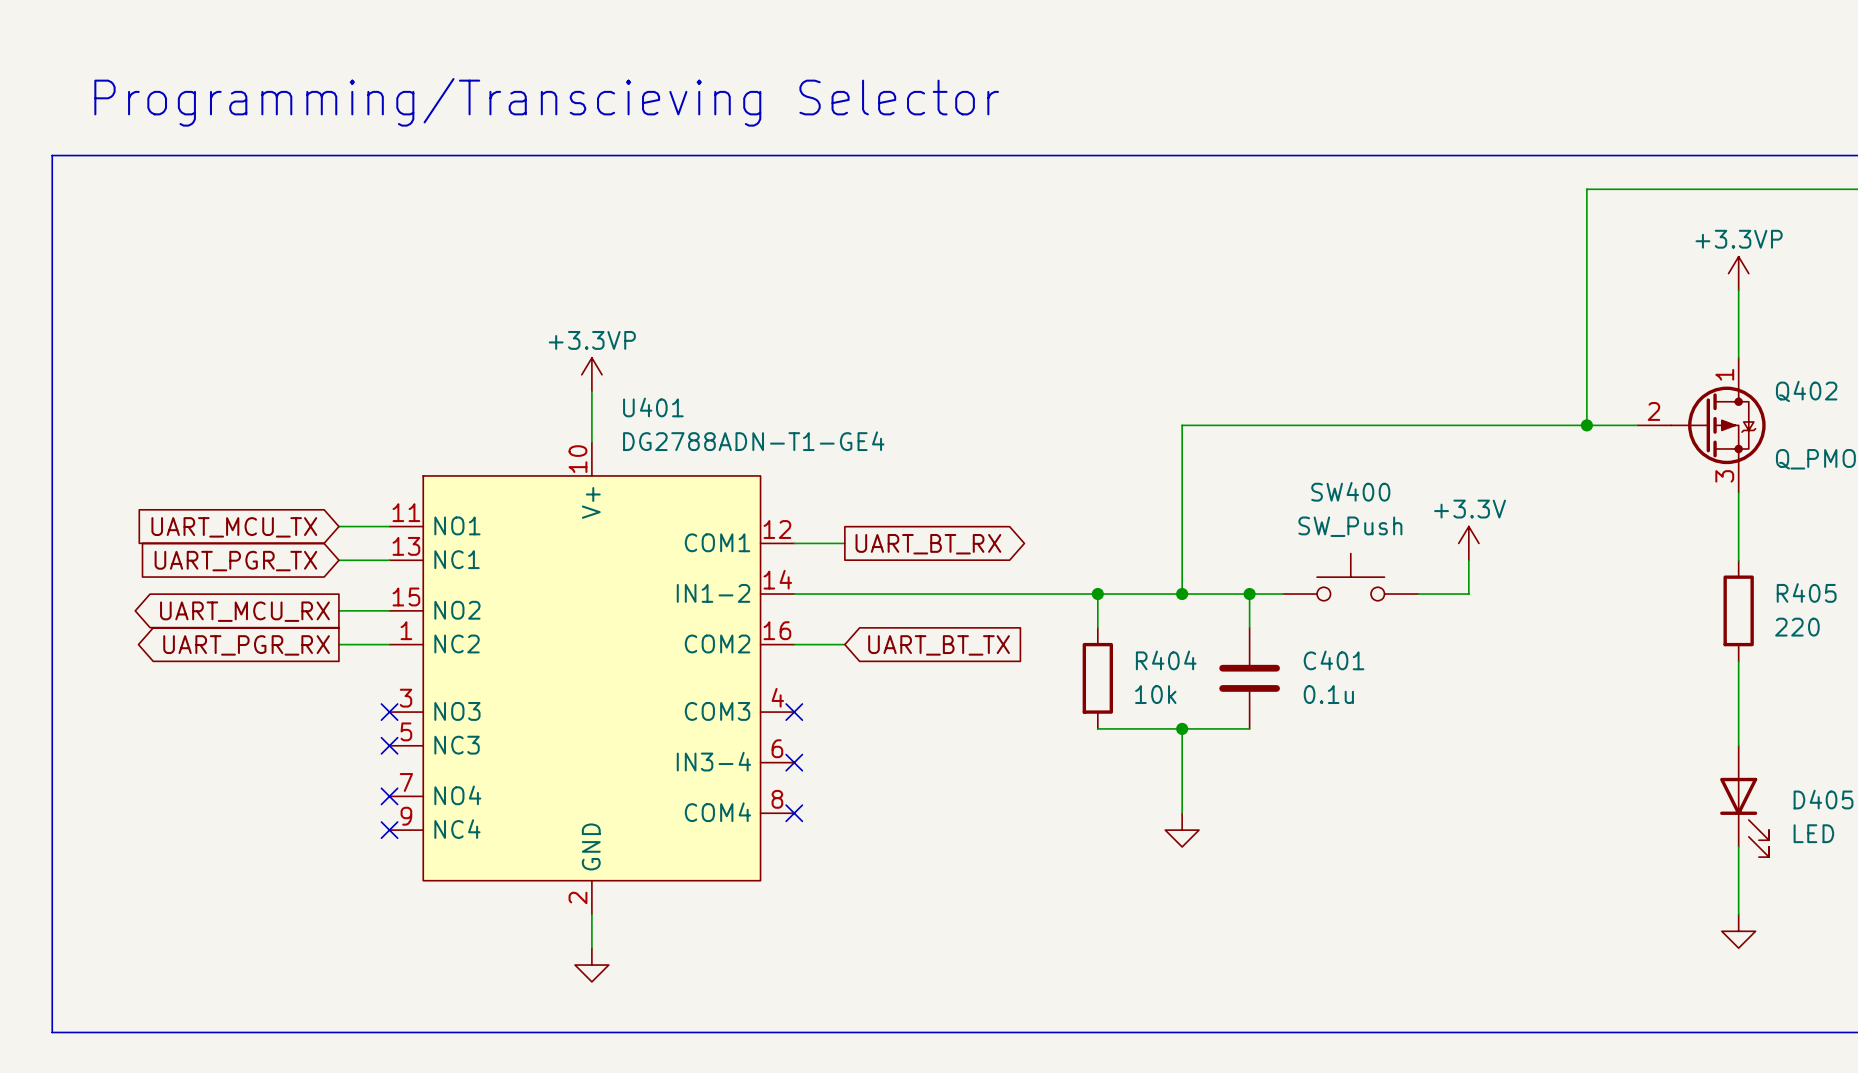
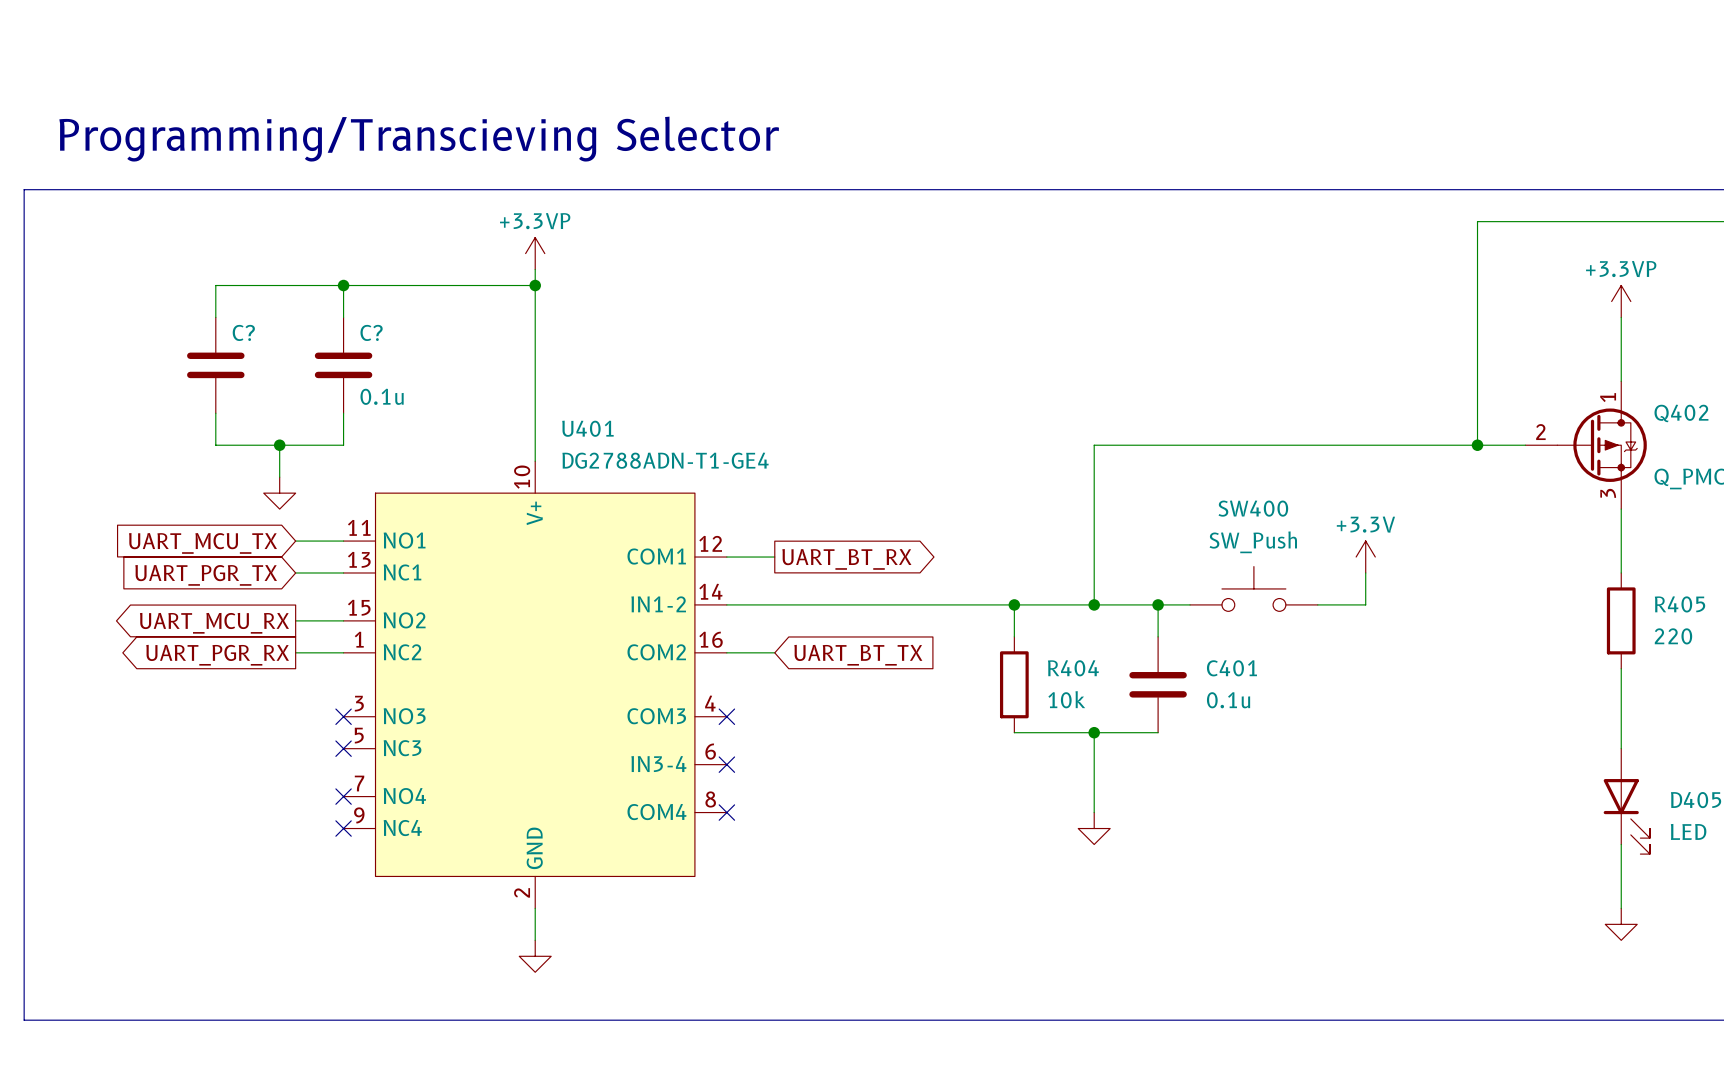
wire: none -> (535, 269) (535, 413)
wire: none -> (343, 285) (343, 317)
junction: none -> (343, 285)
wire: none -> (535, 285) (215, 285) (215, 317)
junction: none -> (535, 285)
C?: none -> (215, 365)
C?: none -> 0.1u (343, 365)
power symbol position: +3.3VP (591, 374) -> +3.3VP (535, 253)
wire: none -> (215, 413) (215, 445) (343, 445) (343, 413)
wire: none -> (279, 445) (279, 477)
junction: none -> (279, 445)
power symbol: none -> (279, 493)

